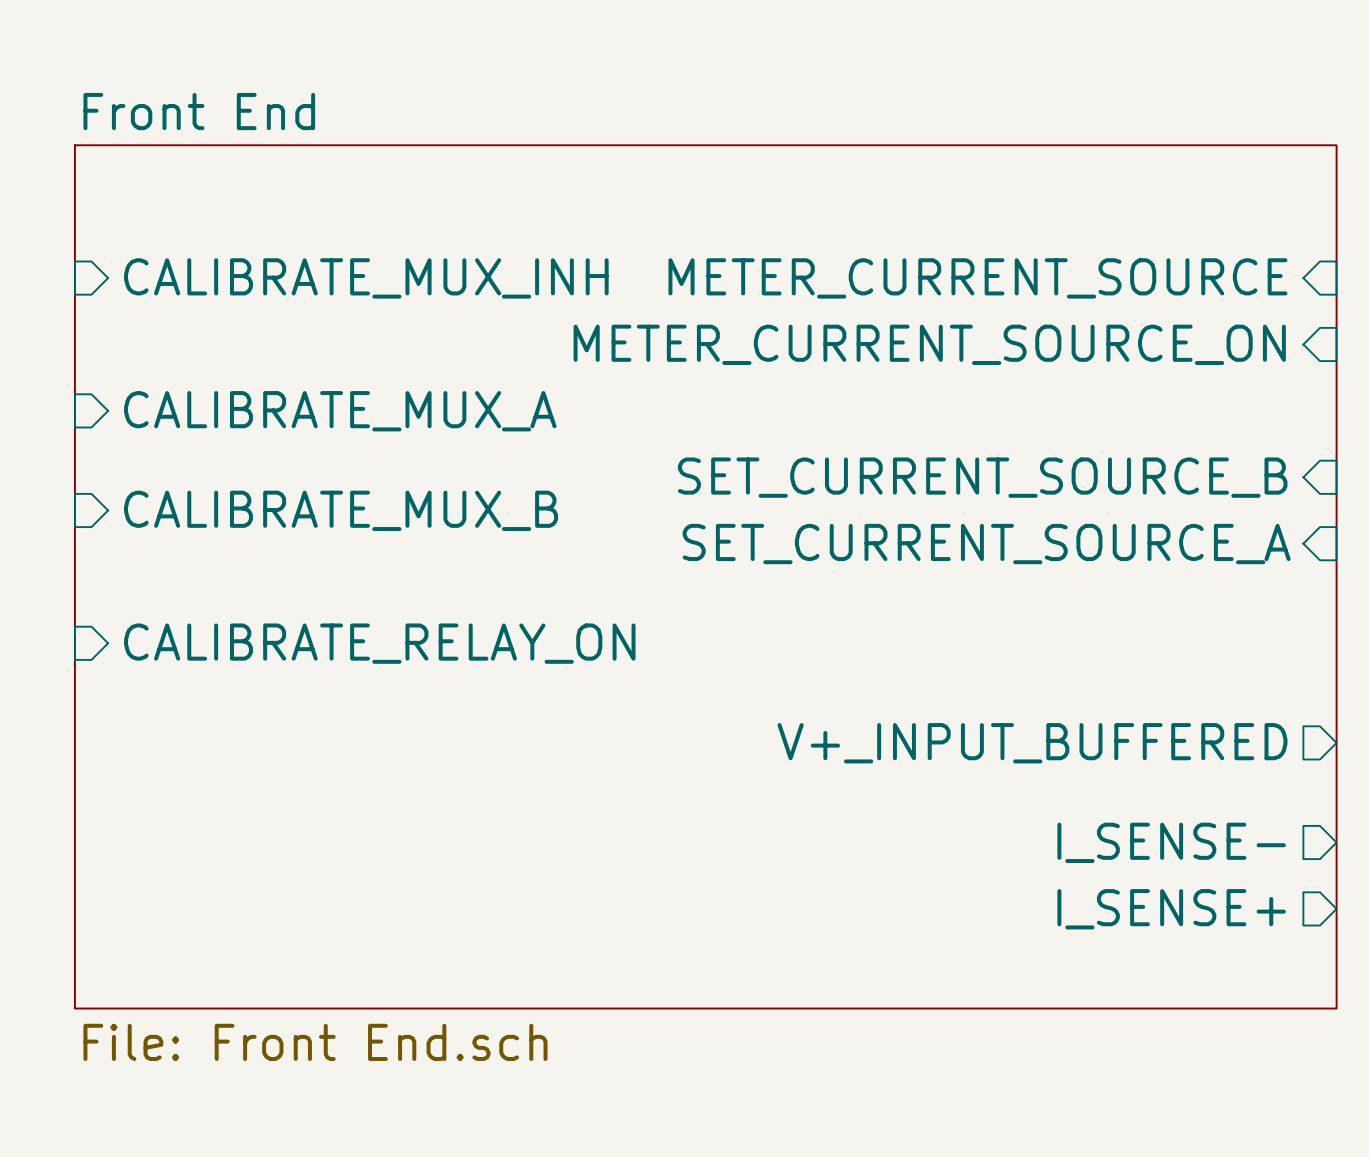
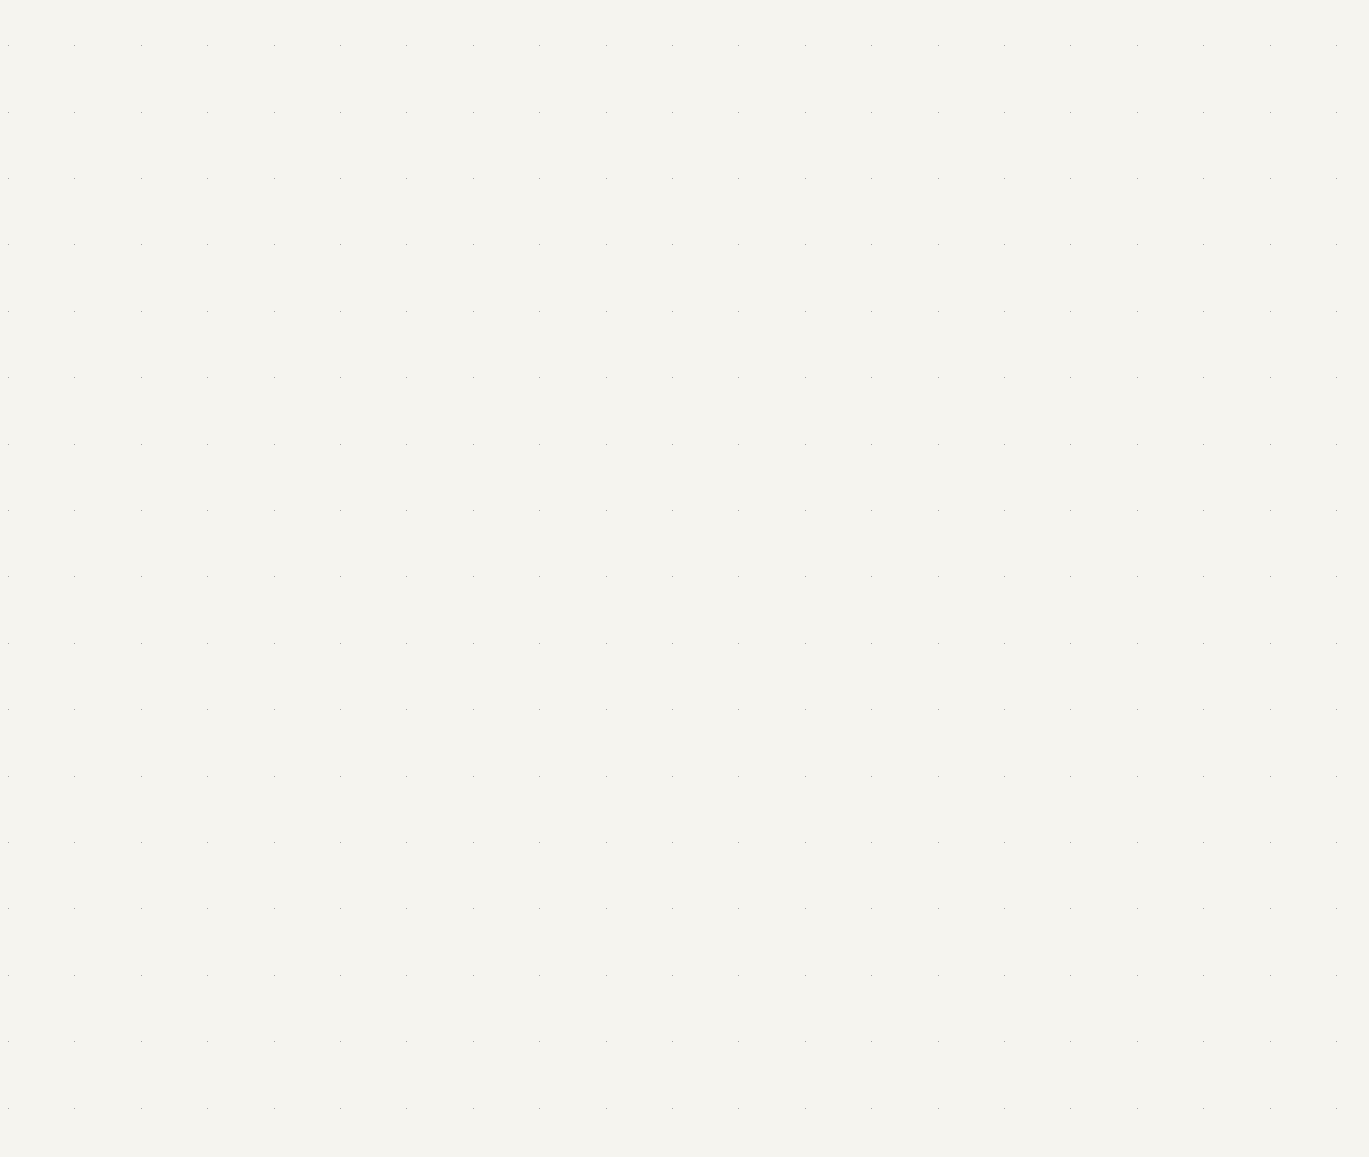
sheet pin: CALIBRATE_MUX_INH (366, 278) -> none
sheet pin: METER_CURRENT_SOURCE (977, 278) -> none
sheet pin: METER_CURRENT_SOURCE_ON (929, 344) -> none
sheet pin: CALIBRATE_MUX_A (340, 411) -> none
sheet pin: SET_CURRENT_SOURCE_B (982, 477) -> none
sheet pin: CALIBRATE_MUX_B (341, 510) -> none
sheet pin: SET_CURRENT_SOURCE_A (986, 544) -> none
sheet Front End: File: Front End.sch (705, 576) -> none
sheet pin: CALIBRATE_RELAY_ON (379, 643) -> none
sheet pin: V+_INPUT_BUFFERED (1032, 743) -> none
sheet pin: I_SENSE- (1171, 842) -> none
sheet pin: I_SENSE+ (1171, 909) -> none

